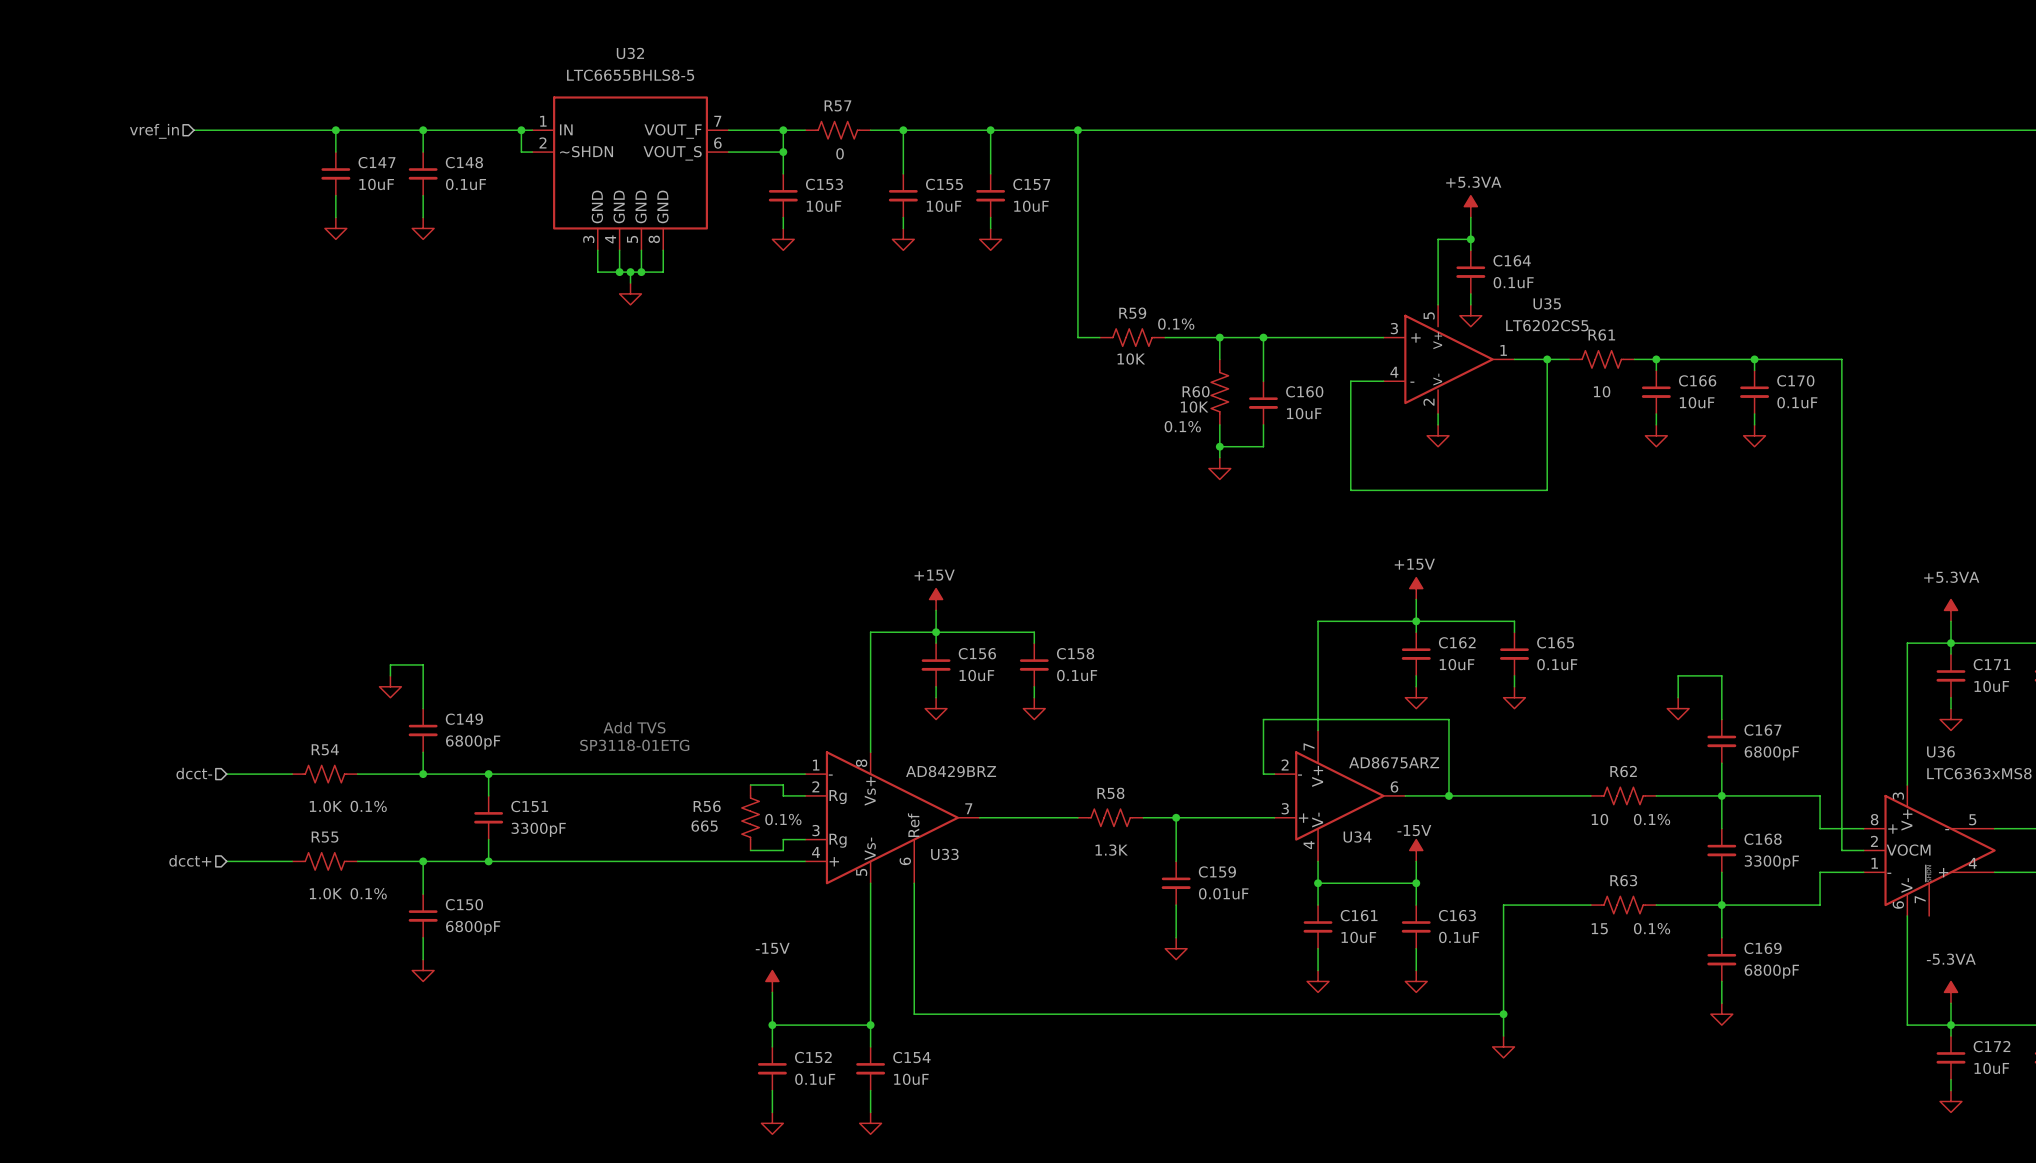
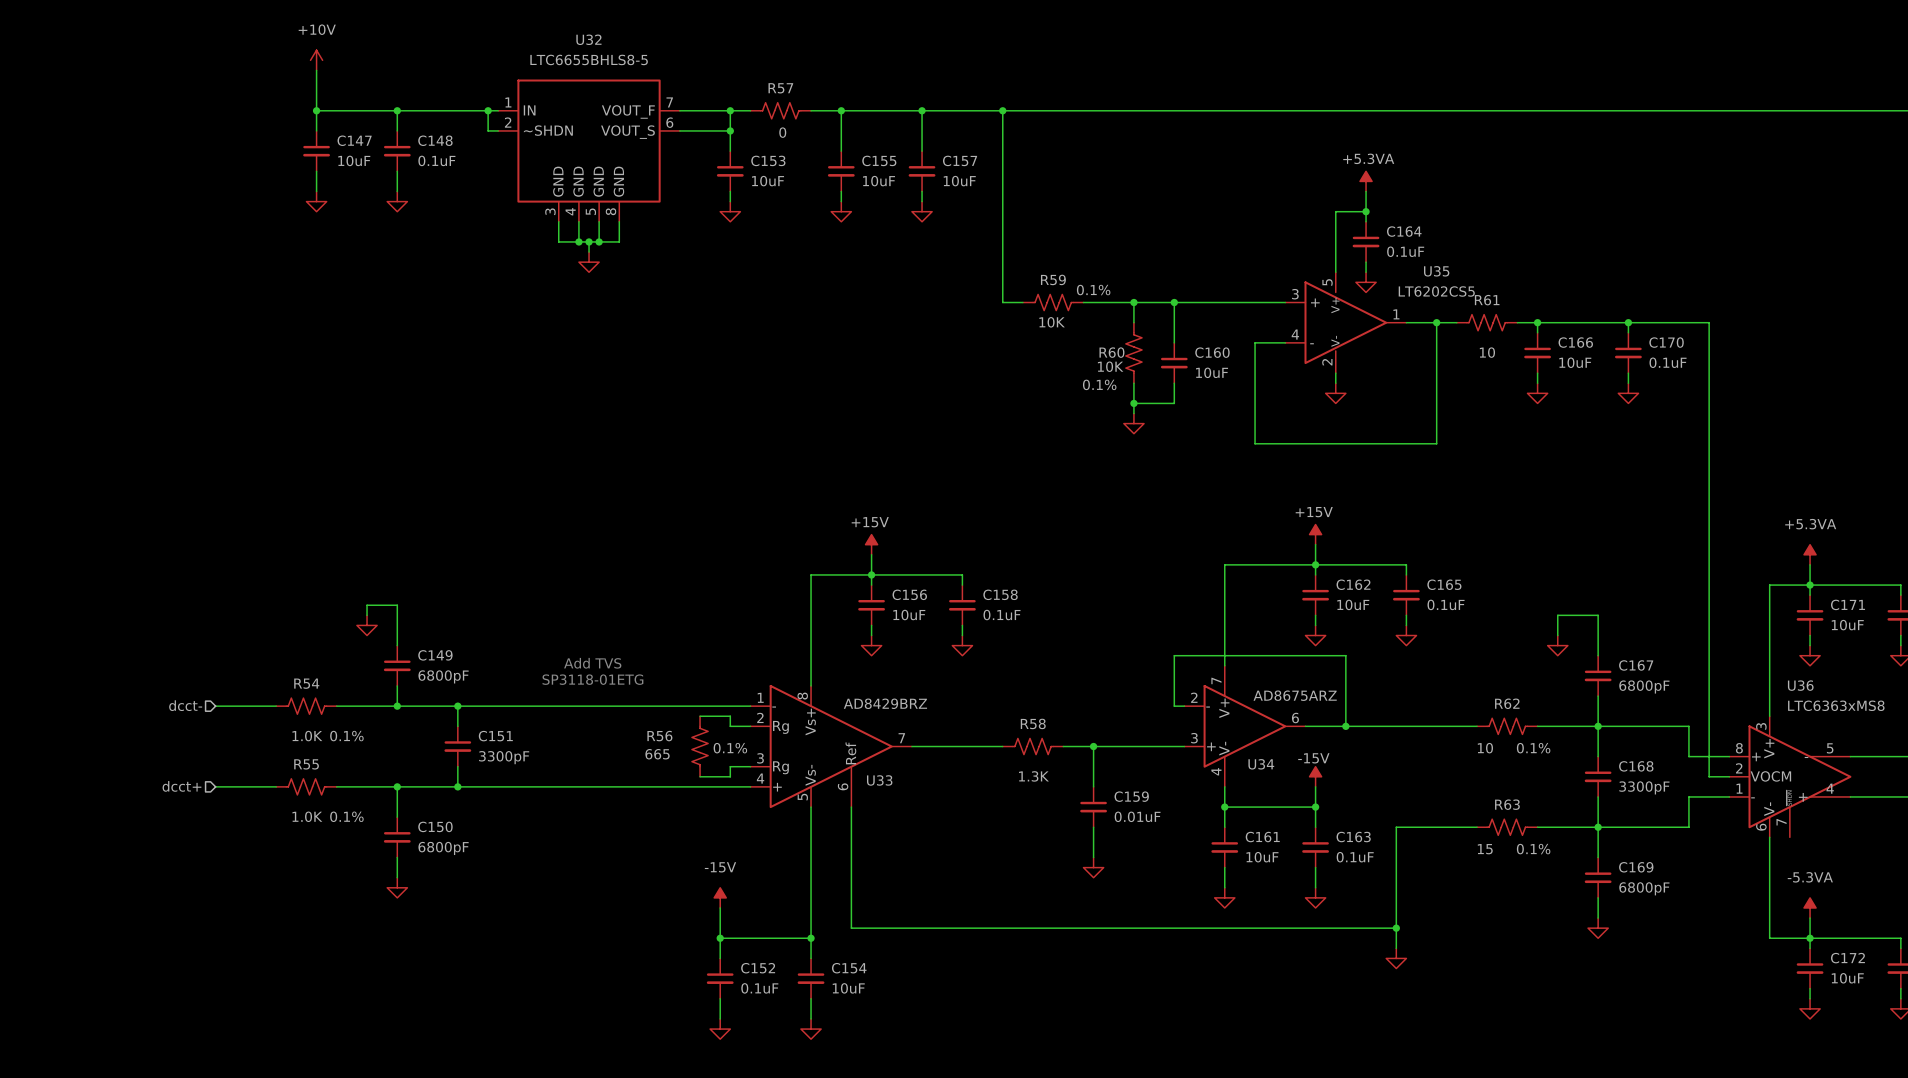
power symbol: none -> +10V (316, 60)
wire: (193, 130) (335, 130) -> (316, 70) (316, 110)
hierarchical label: vref_in (154, 131) -> none

